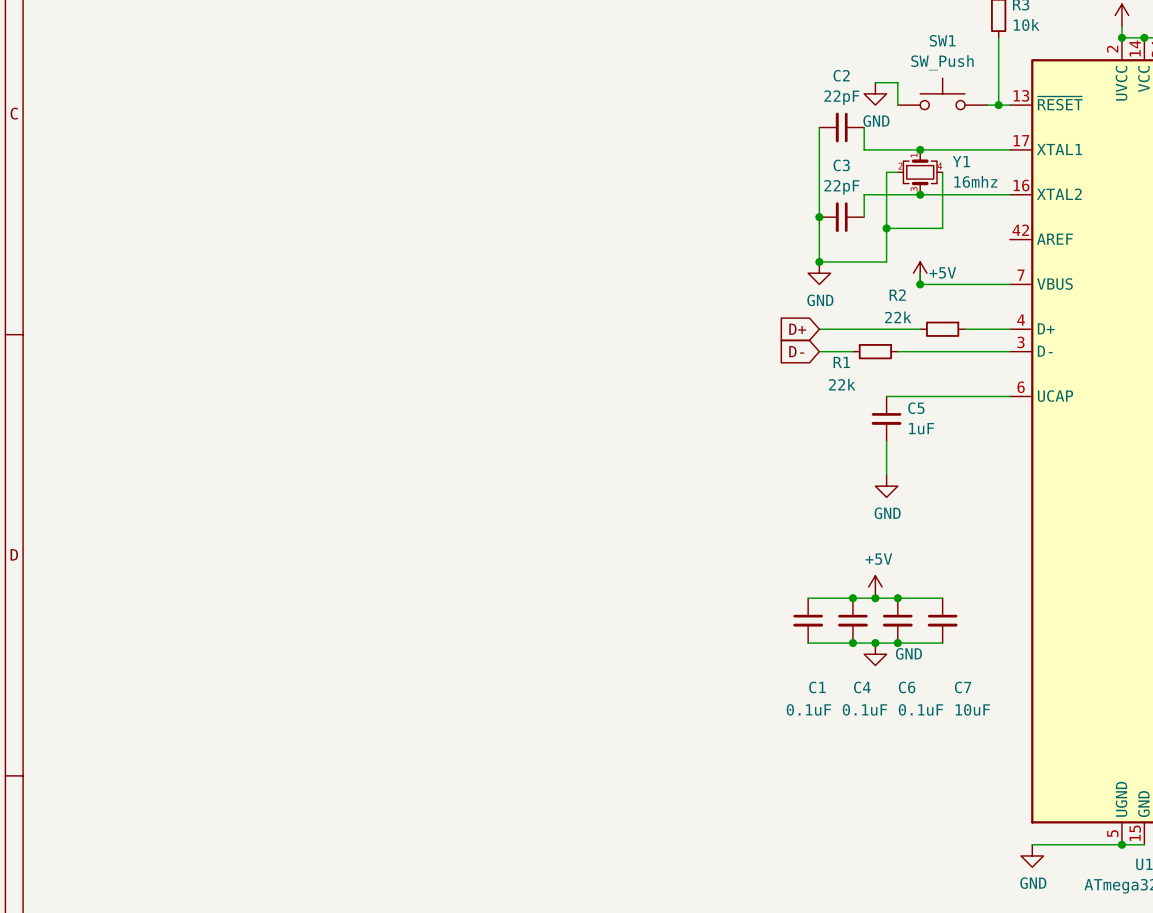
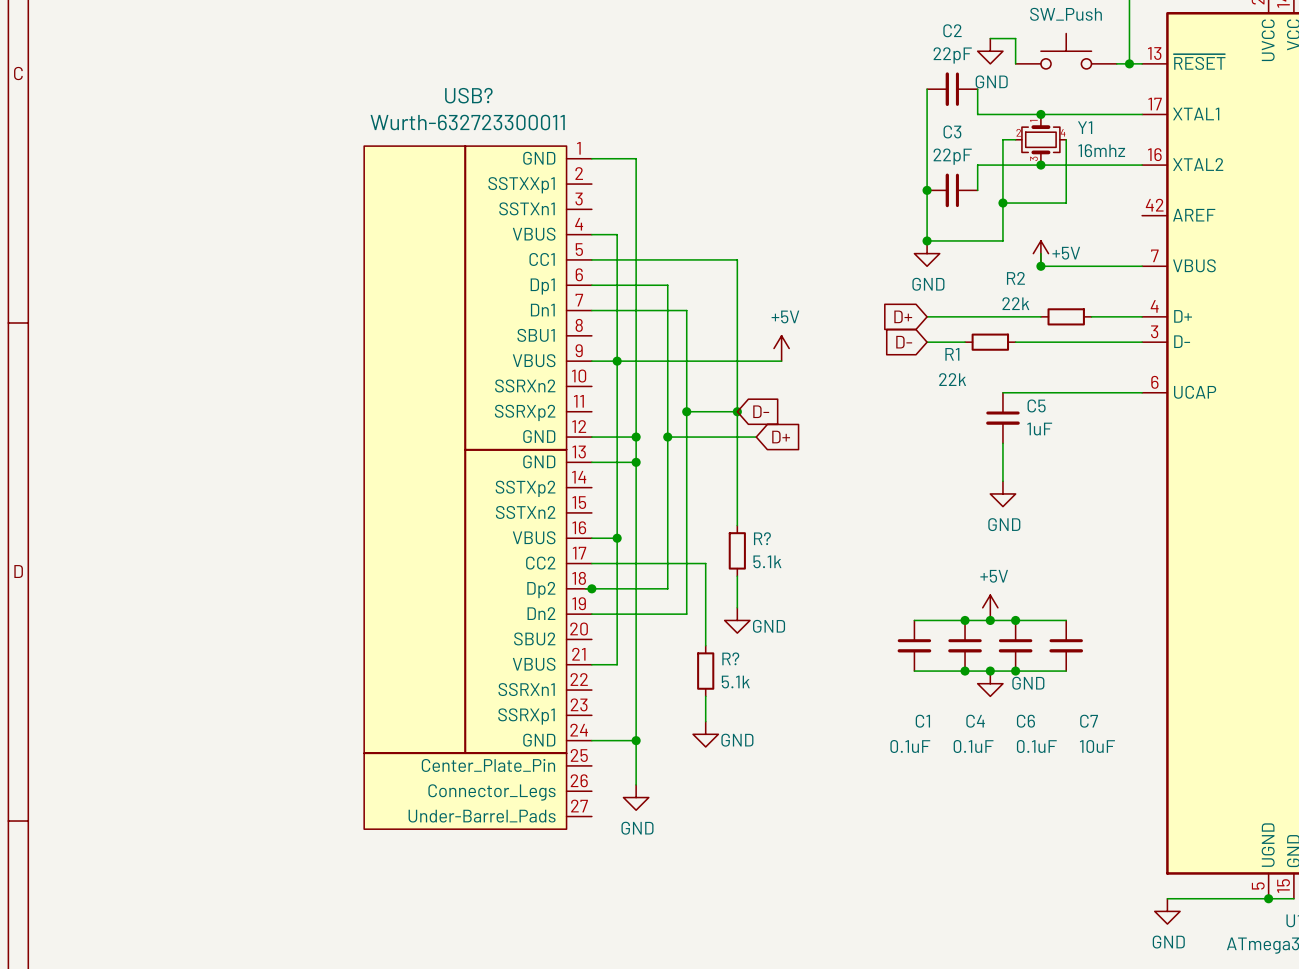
wire: none -> (591, 158) (636, 158) (636, 784)
wire: none -> (591, 234) (617, 234) (617, 664) (591, 664)
wire: none -> (591, 259) (737, 259) (737, 525)
wire: none -> (591, 285) (667, 285) (667, 588) (585, 588)
wire: none -> (591, 310) (686, 310) (686, 614) (591, 614)
power symbol: none -> +5V (781, 348)
wire: none -> (591, 361) (781, 361)
junction: none -> (617, 361)
wire: none -> (686, 411) (737, 411)
junction: none -> (686, 411)
junction: none -> (737, 411)
global label: none -> D- (761, 411)
wire: none -> (591, 437) (636, 437)
junction: none -> (636, 437)
wire: none -> (667, 437) (756, 437)
junction: none -> (667, 437)
global label: none -> D+ (781, 437)
wire: none -> (591, 462) (636, 462)
junction: none -> (636, 462)
USB?: none -> Wurth-632723300011 (478, 487)
wire: none -> (591, 538) (617, 538)
junction: none -> (617, 538)
R?: none -> 5.1k (737, 550)
wire: none -> (591, 563) (705, 563) (705, 645)
wire: none -> (737, 576) (737, 607)
junction: none -> (591, 588)
power symbol: none -> GND (737, 620)
R?: none -> 5.1k (705, 671)
wire: none -> (705, 696) (705, 721)
power symbol: none -> GND (705, 734)
wire: none -> (591, 740) (636, 740)
junction: none -> (636, 740)
power symbol: none -> GND (636, 797)

